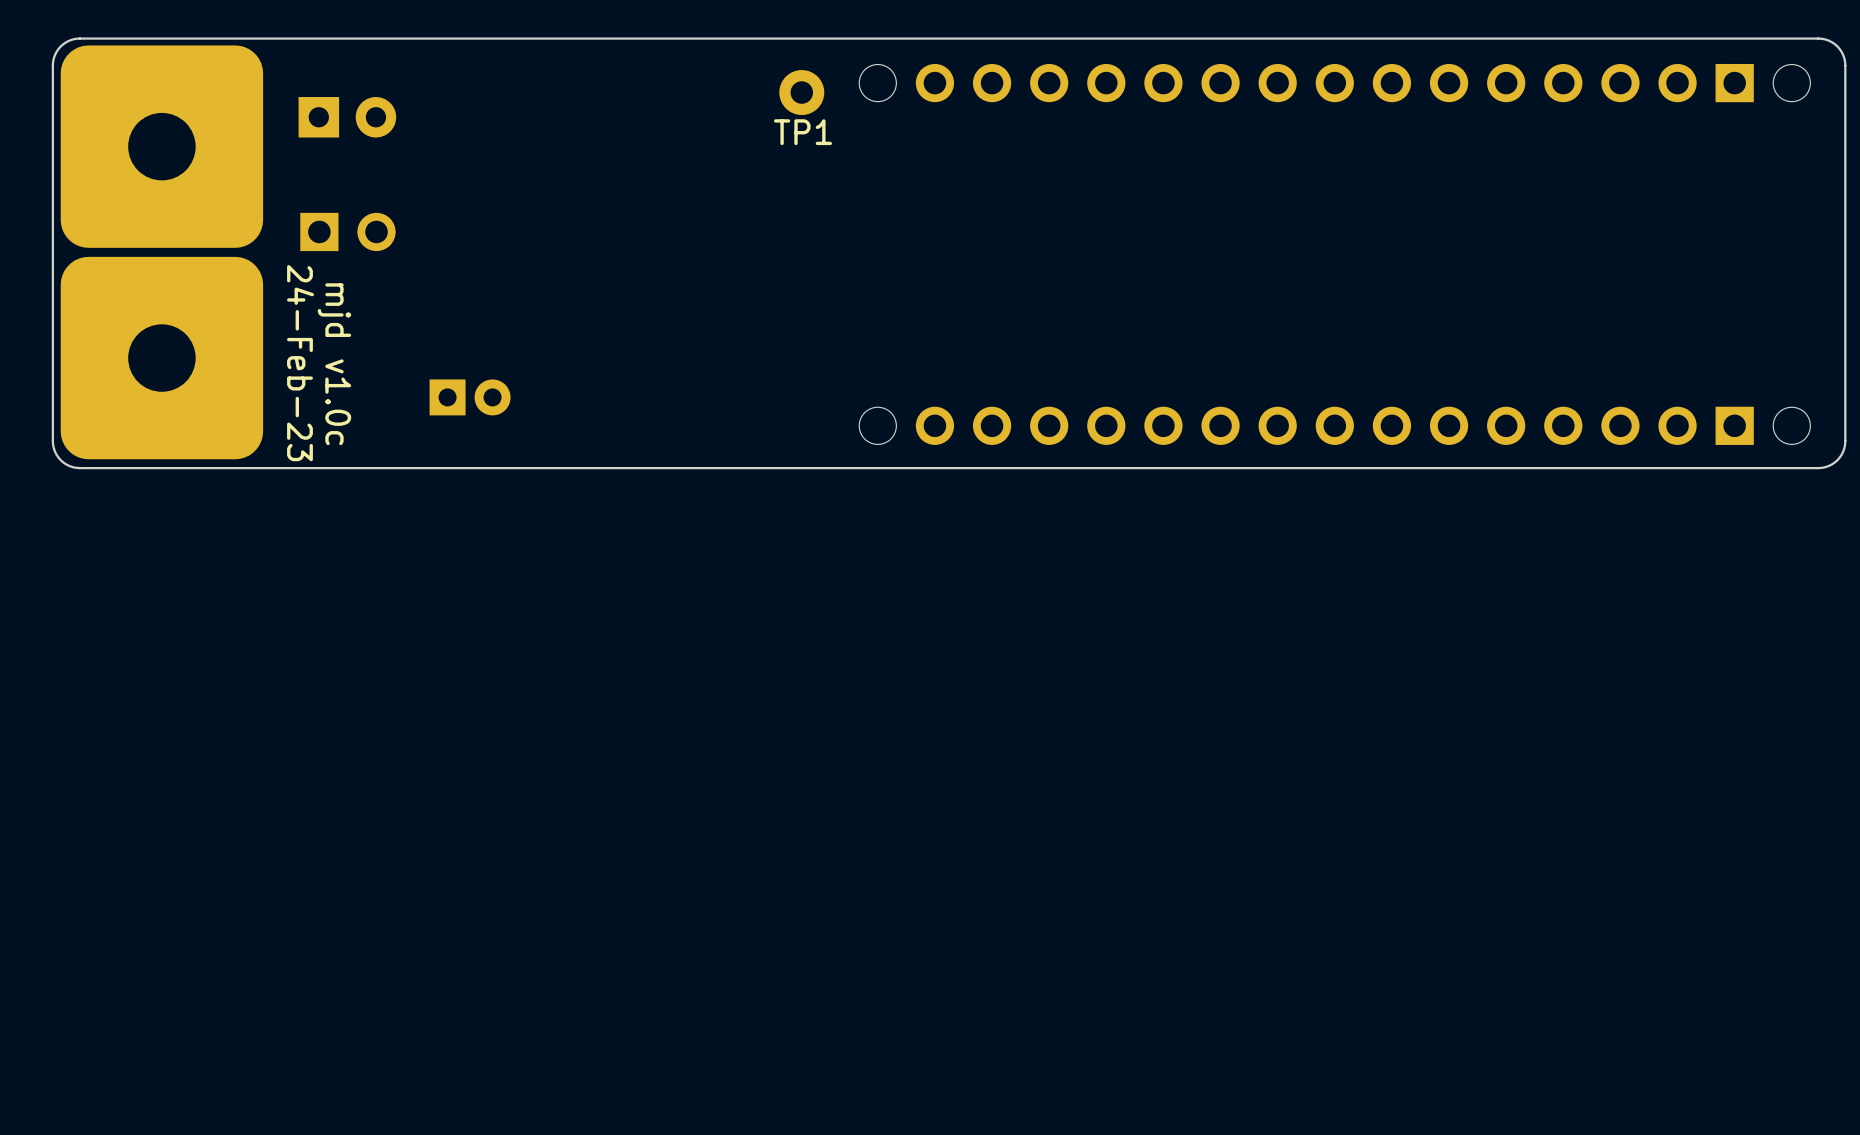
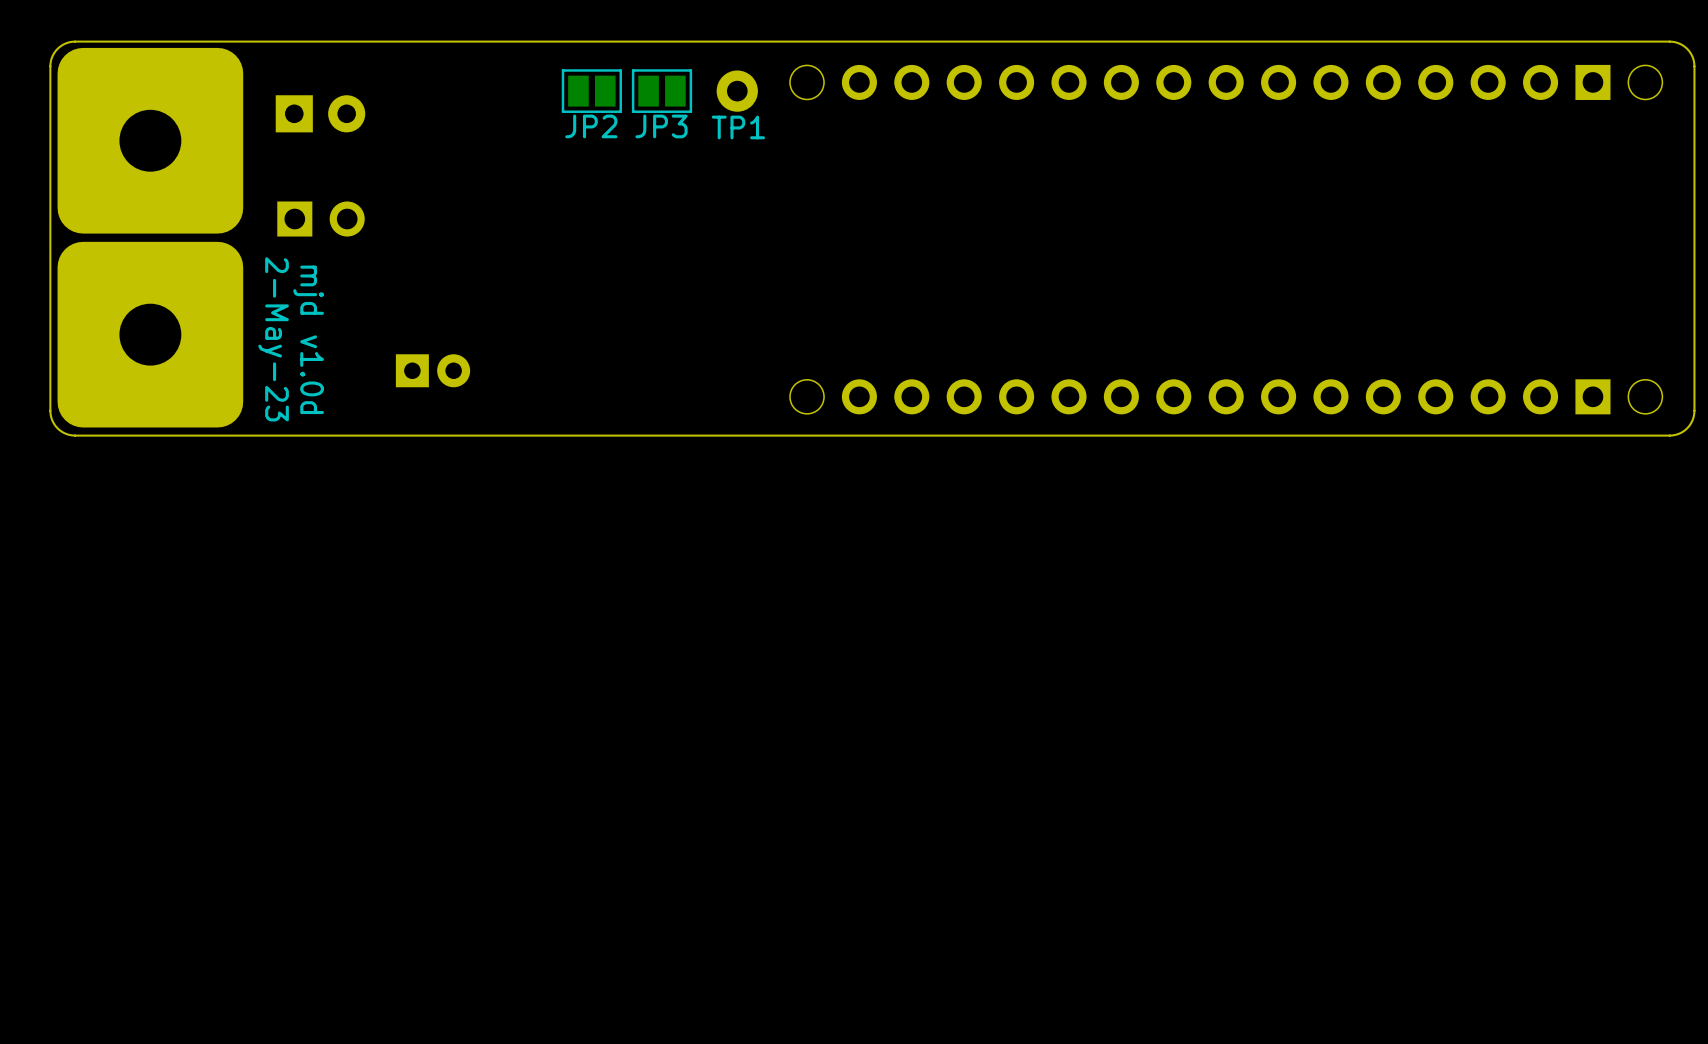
JP2: none -> (591, 91)
JP3: none -> (661, 91)
text: 24-Feb-23 (300, 363) -> 2-May-23 (273, 339)
text: mjd v1.0c (334, 364) -> mjd v1.0d (308, 339)

